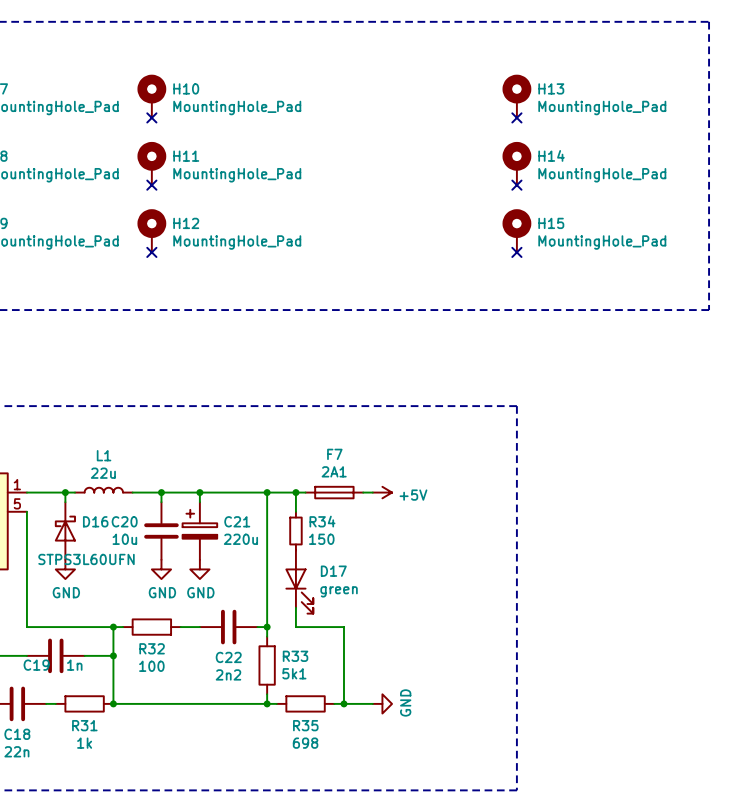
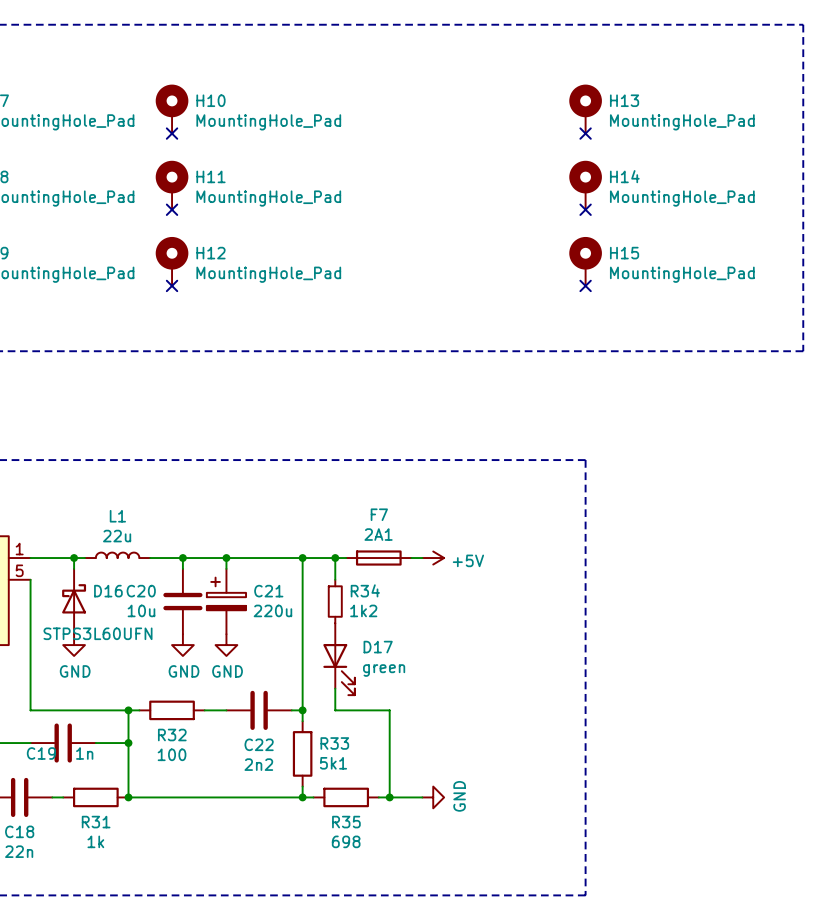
R34 value: 150 (321, 539) -> 1k2 (363, 610)

